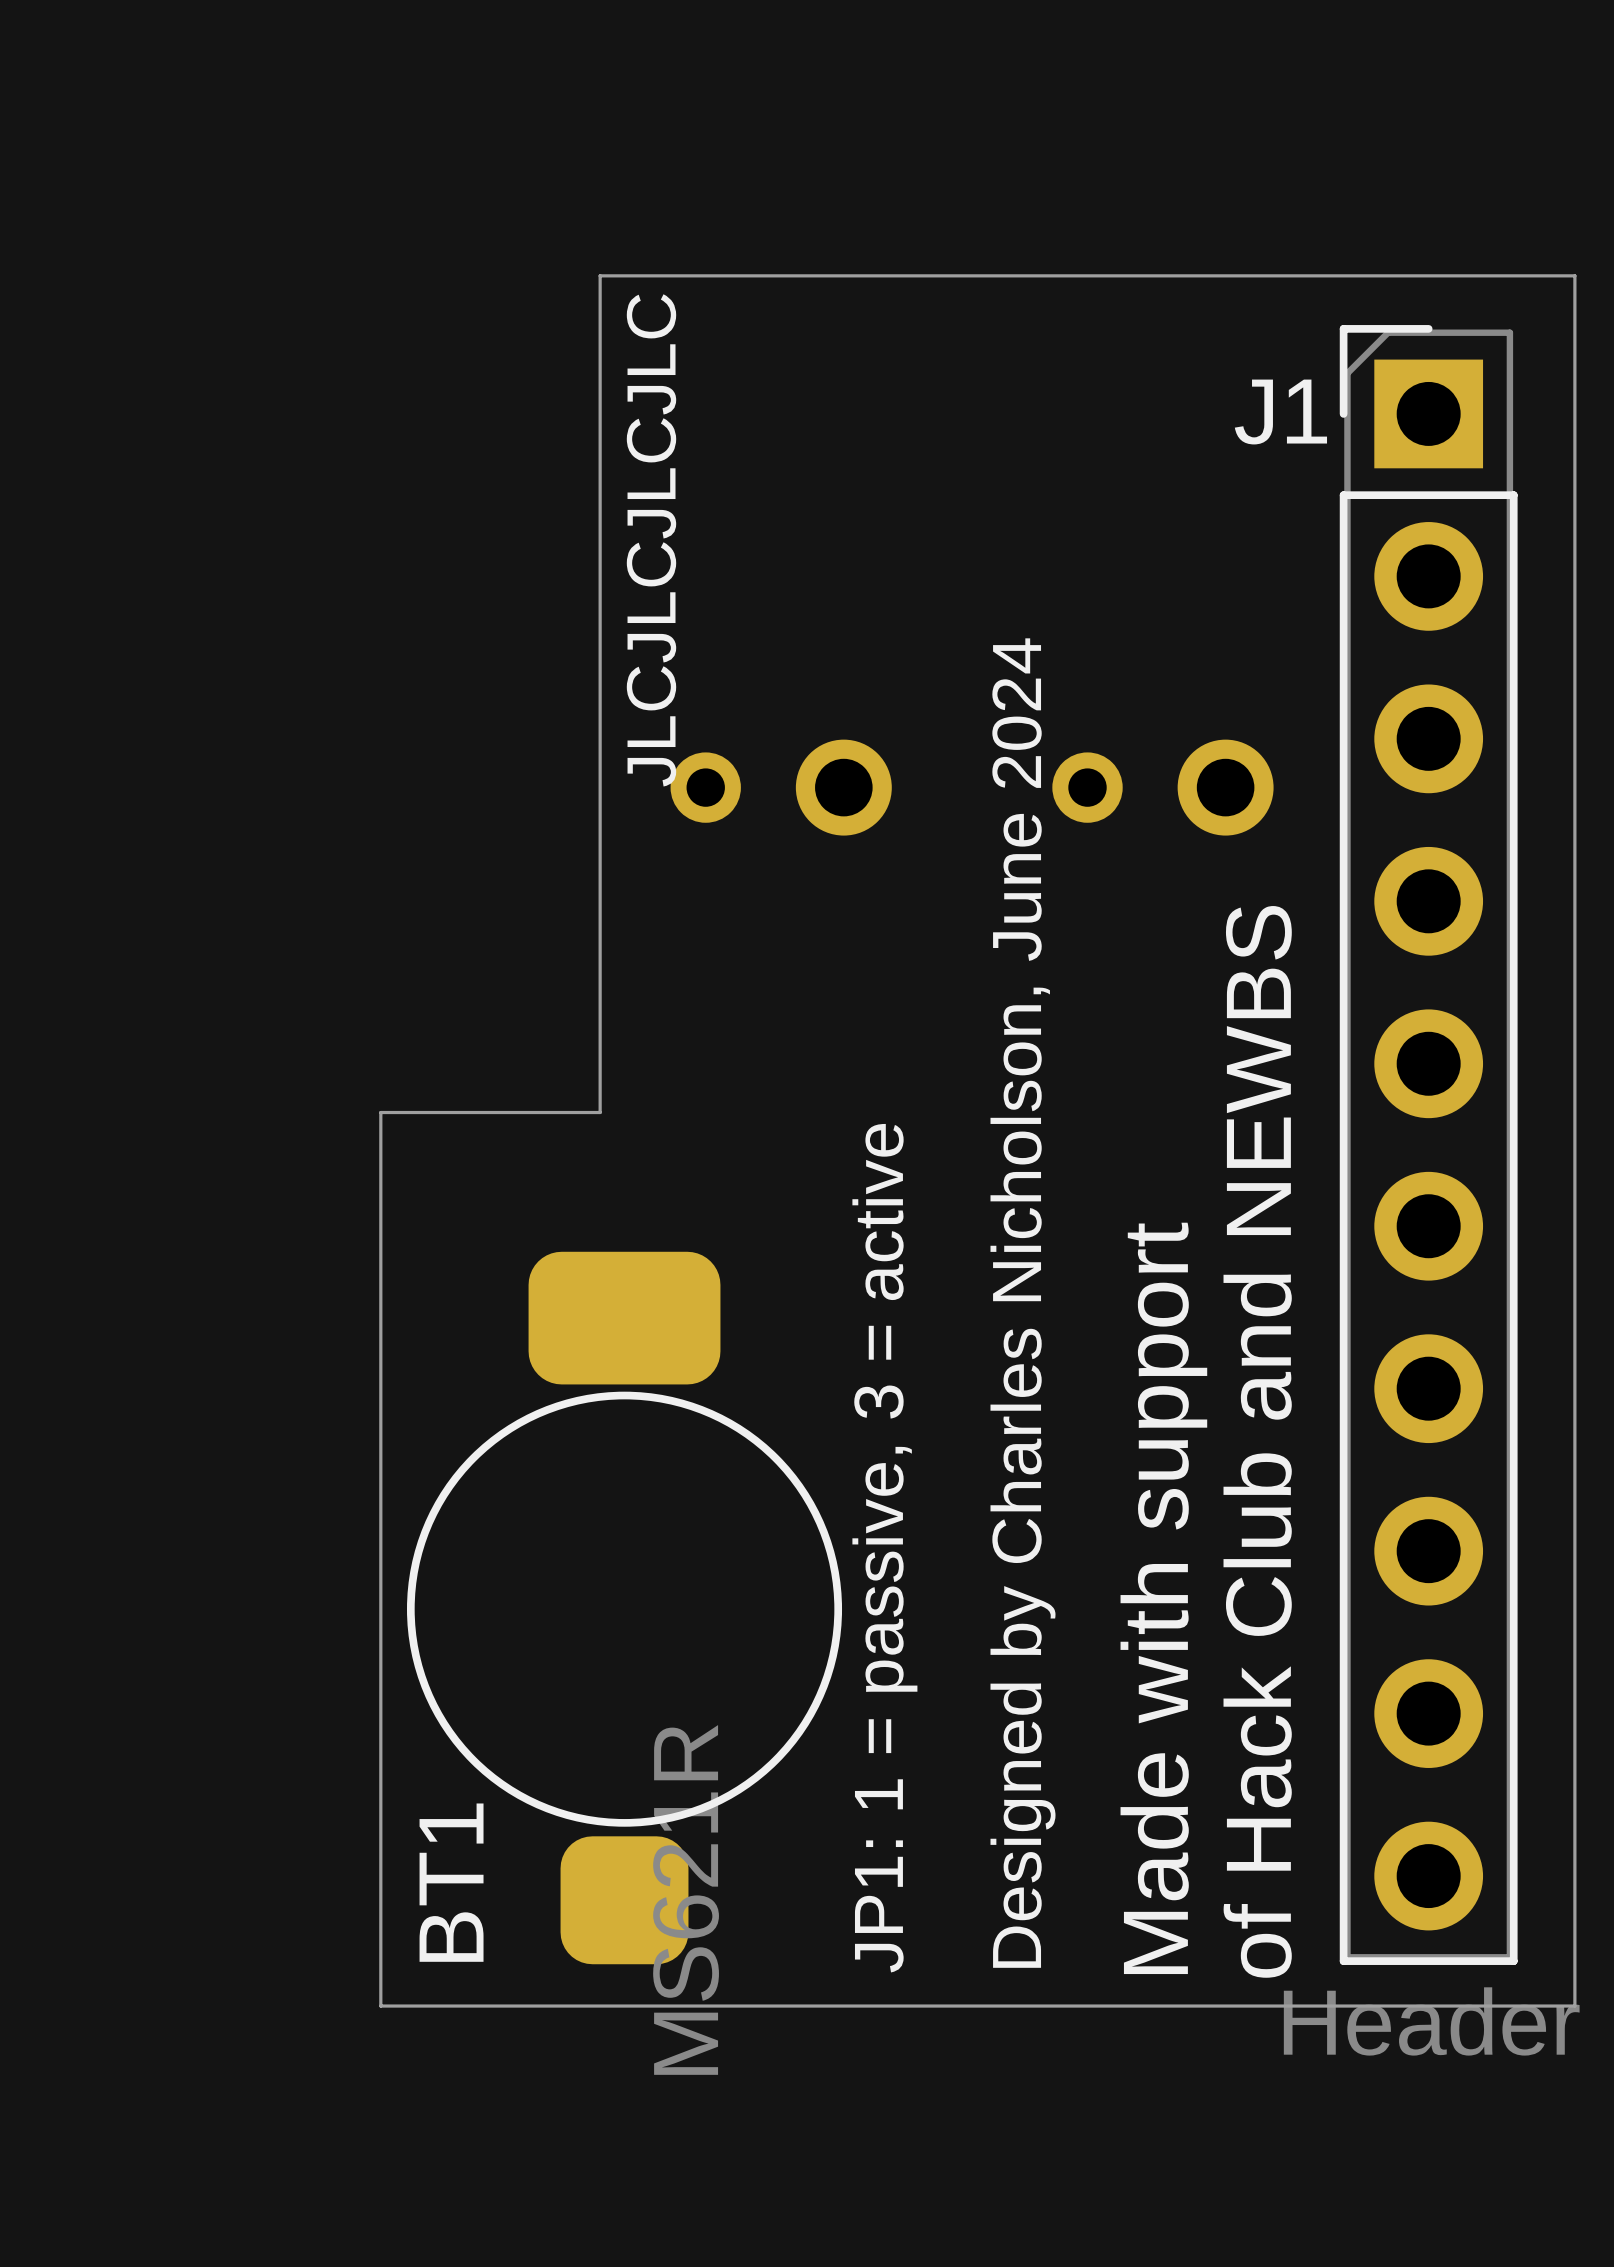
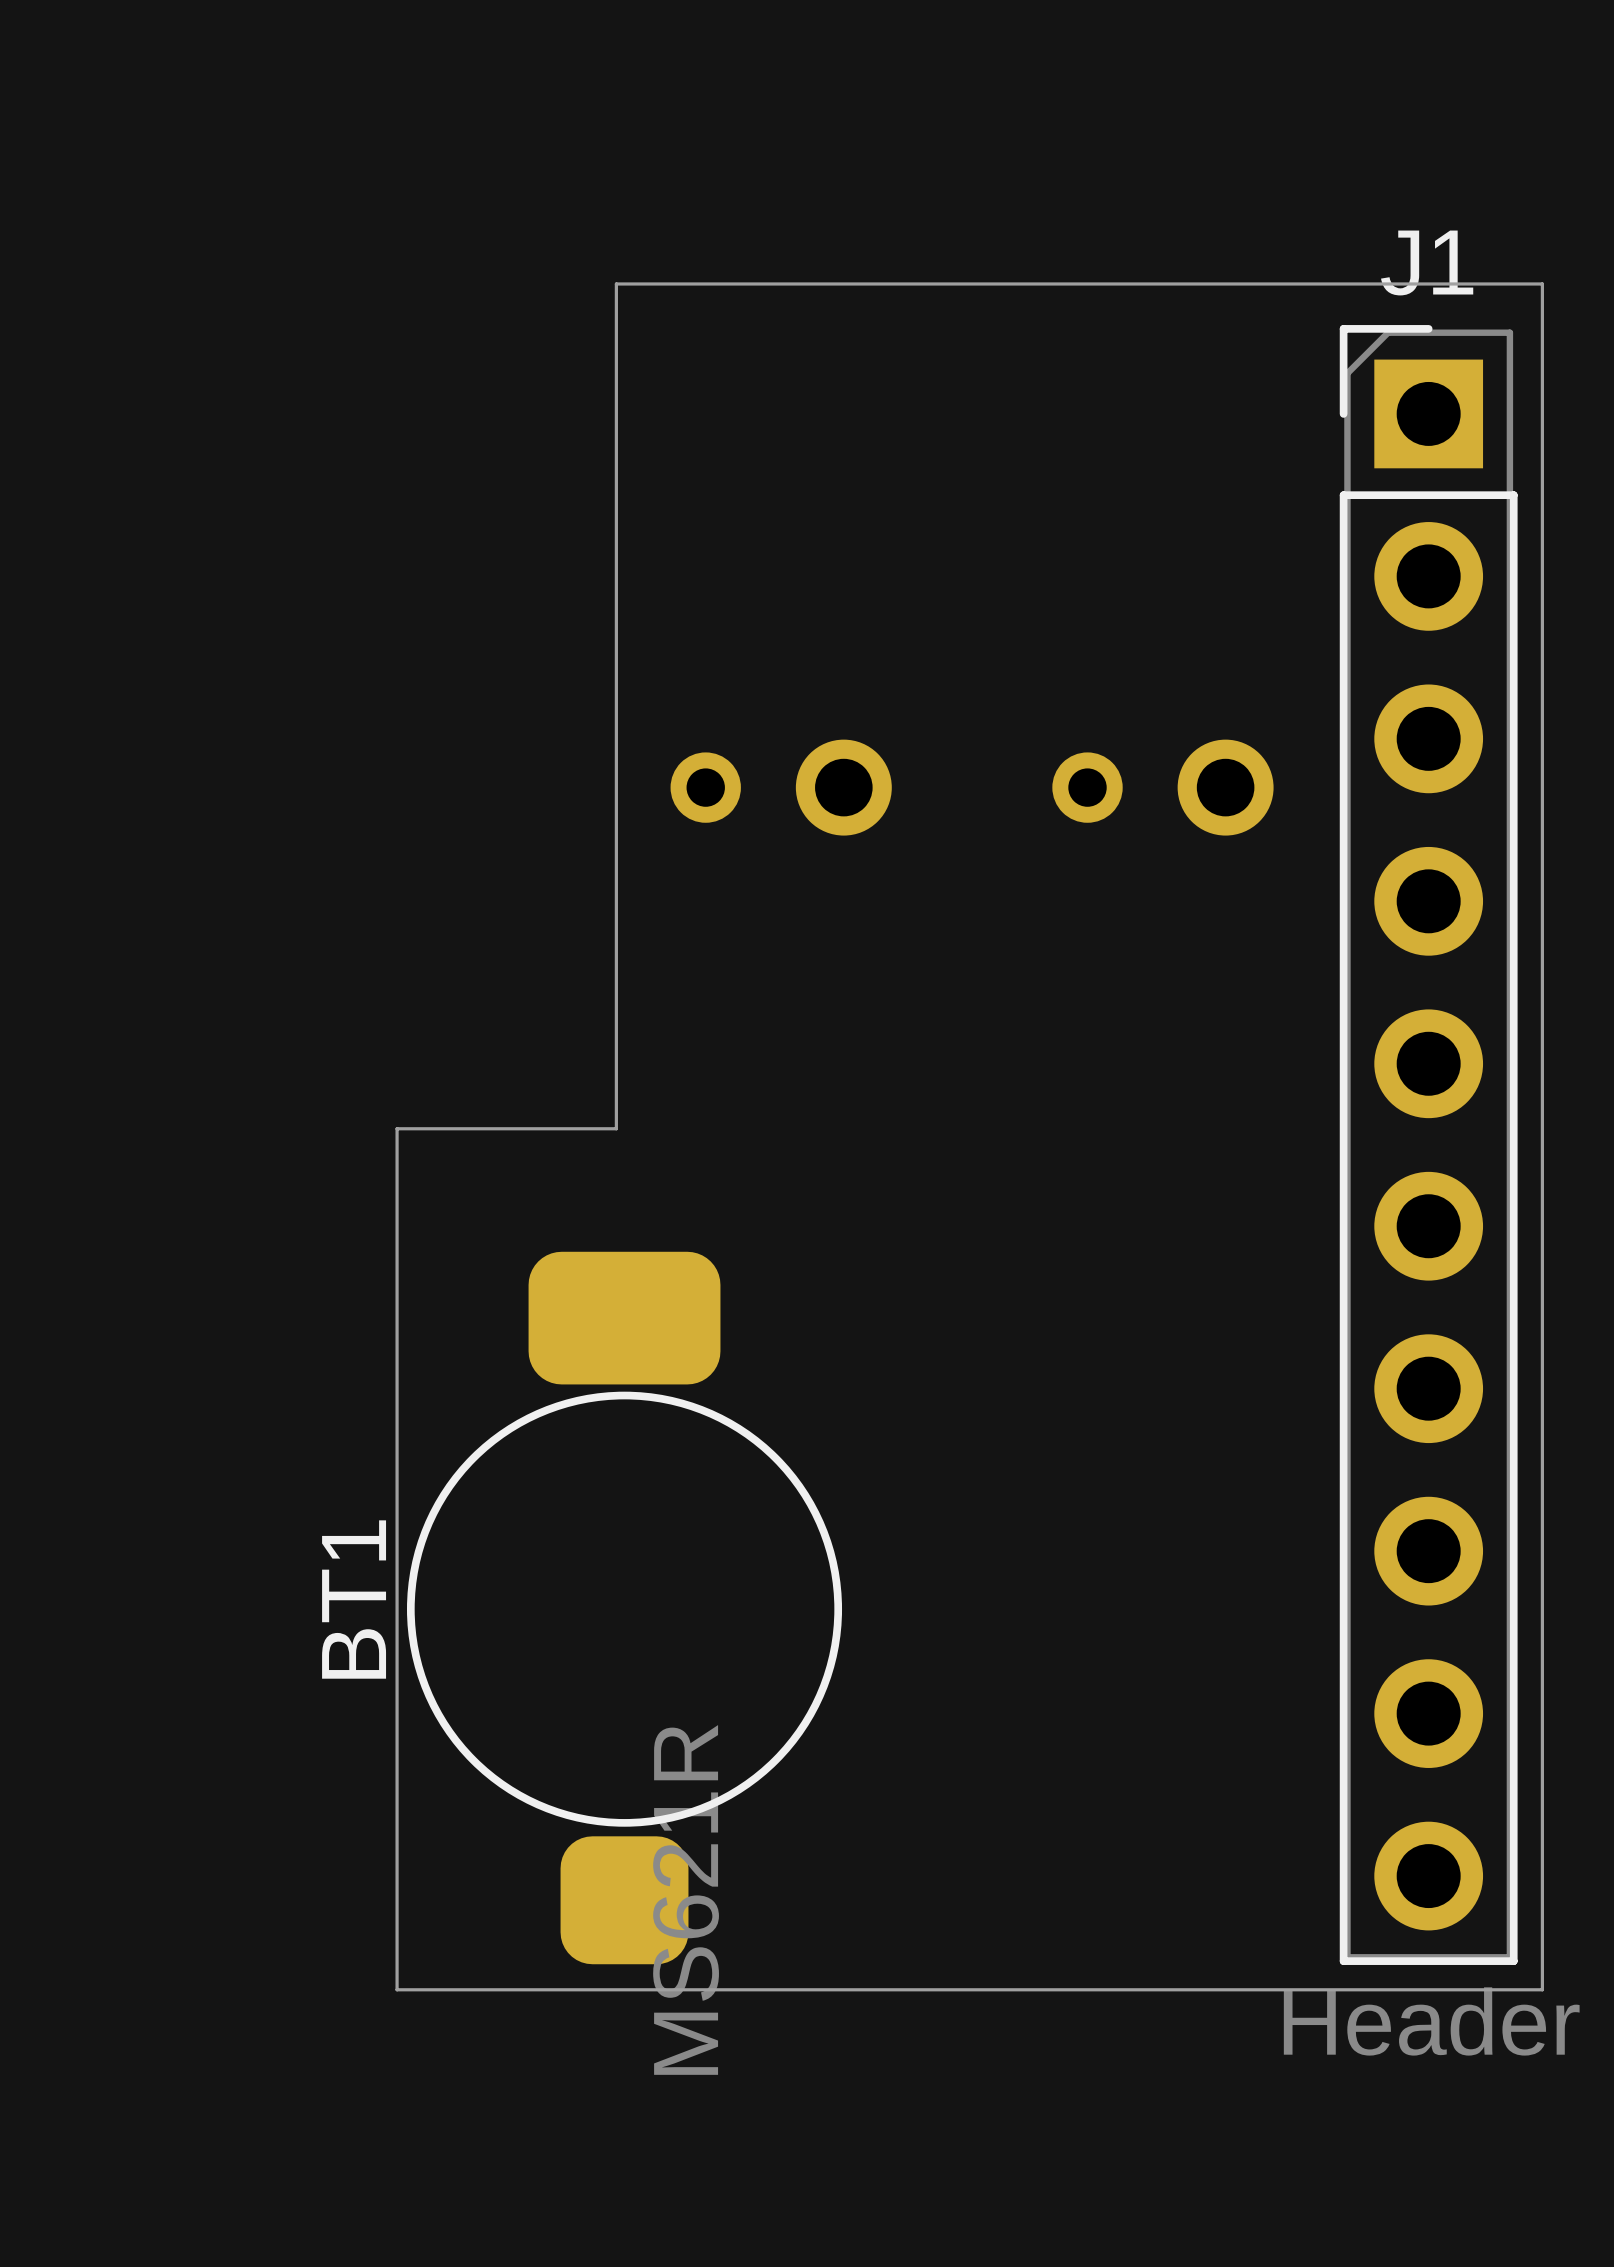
board edge: (1574, 275) (1574, 2006) (380, 2006) (380, 1112) (600, 1112) (600, 275) (1574, 275) -> (1542, 283) (1542, 1989) (397, 1989) (397, 1128) (616, 1128) (616, 283) (1542, 283)
J1 name position: J1 (1280, 412) -> J1 (1427, 262)
text: JLCJLCJLCJLC (651, 540) -> none
text: Designed by Charles Nicholson, June 2024 (1023, 1303) -> none
text: of Hack Club and NEWBS (1257, 1441) -> none
text: JP1: 1 = passive, 3 = active (884, 1548) -> none
text: Made with support (1163, 1598) -> none
BT1 name position: BT1 (451, 1882) -> BT1 (354, 1599)

